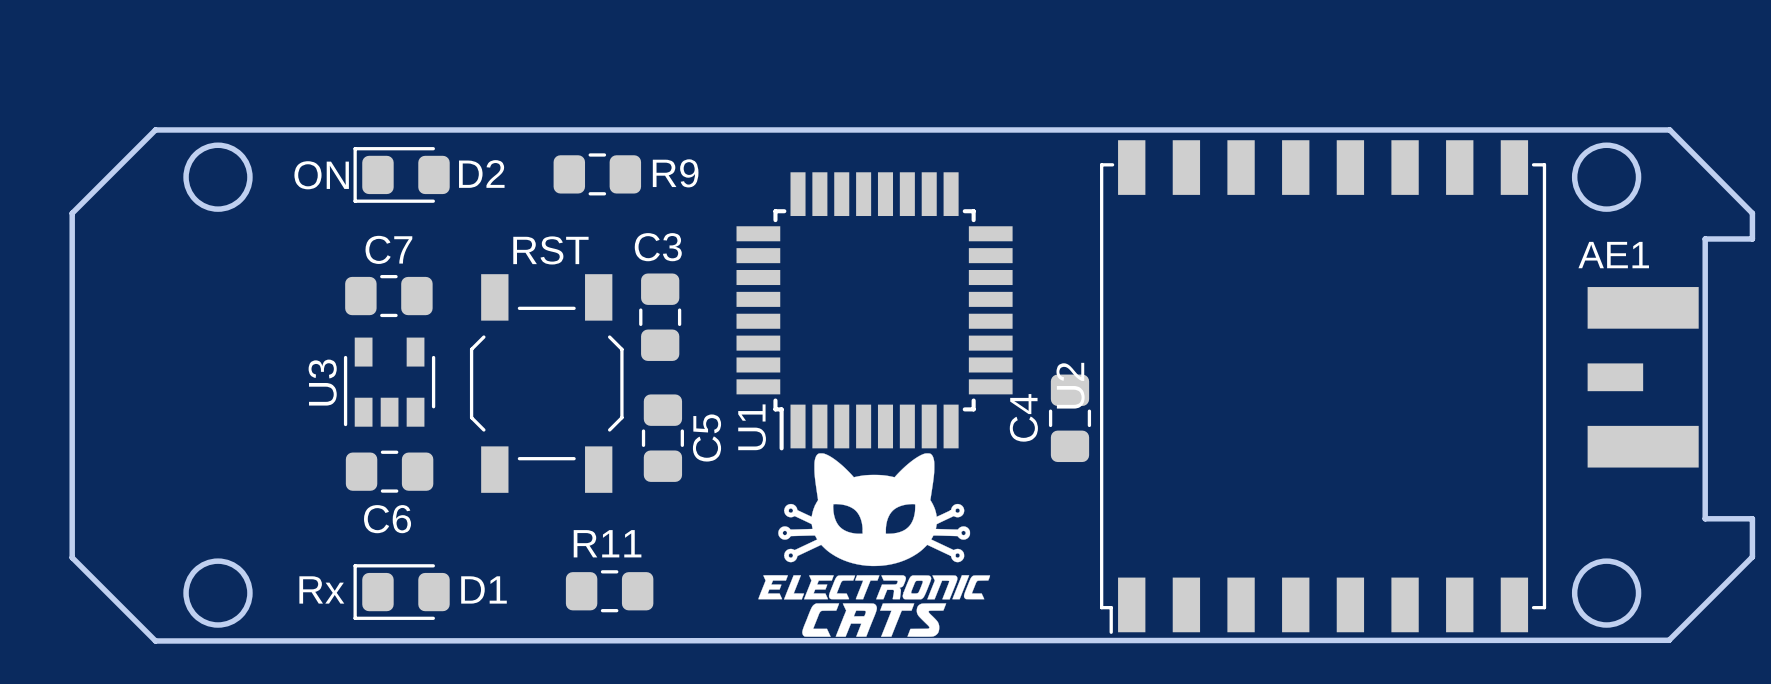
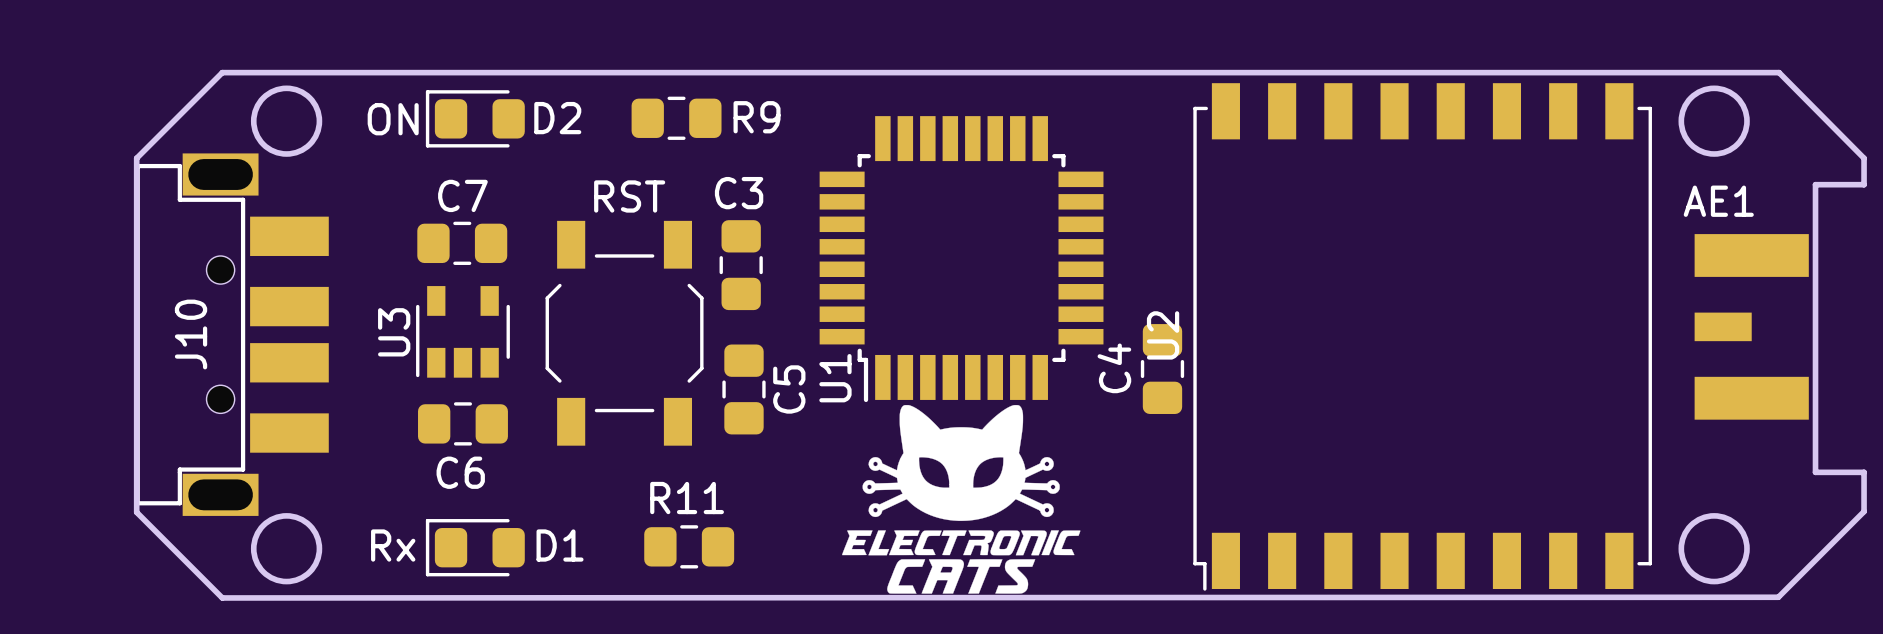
J10: none -> (232, 334)

